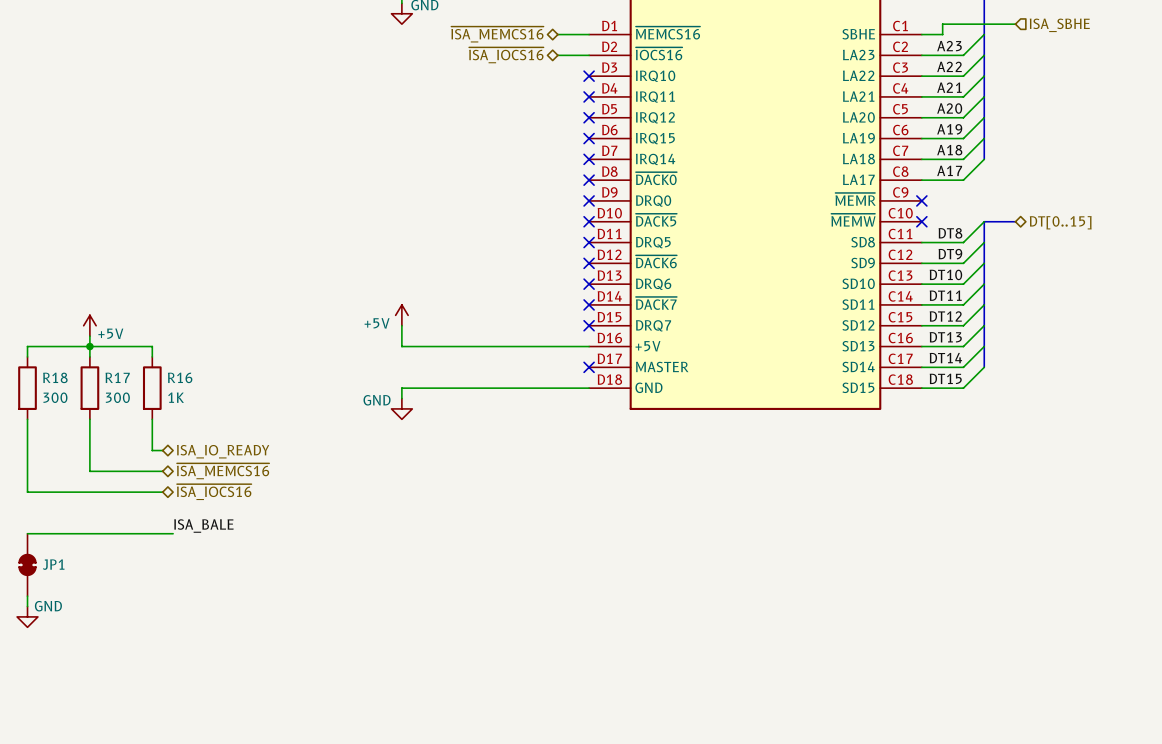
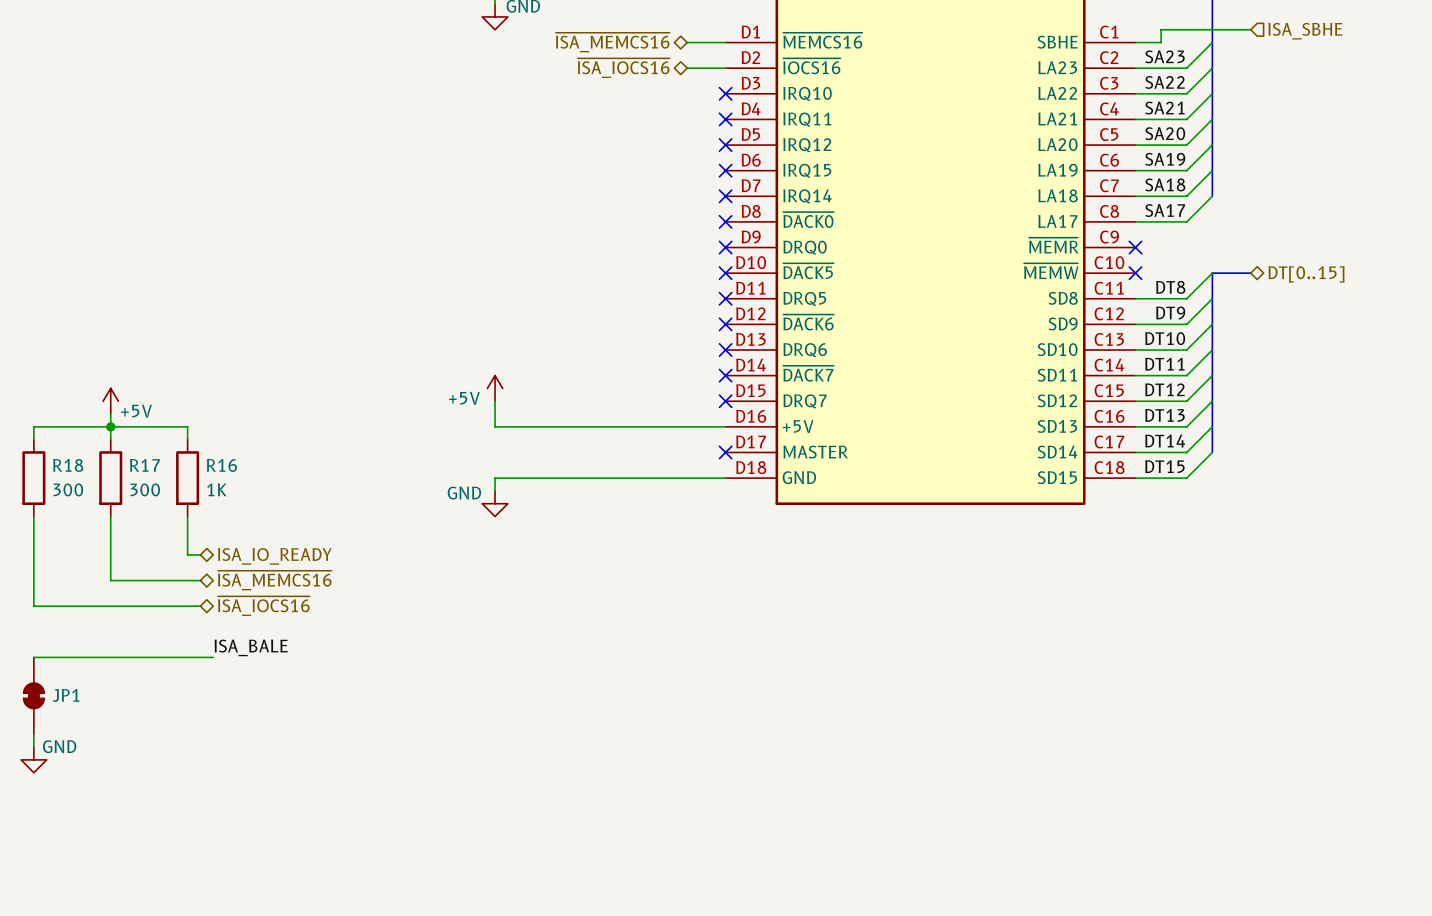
label: A23 (949, 46) -> SA23 (1165, 56)
label: A22 (949, 66) -> SA22 (1164, 82)
label: A21 (949, 87) -> SA21 (1164, 108)
label: A20 (949, 108) -> SA20 (1165, 133)
label: A19 (949, 129) -> SA19 (1165, 159)
label: A18 (949, 150) -> SA18 (1165, 184)
label: A17 (949, 170) -> SA17 (1165, 210)

